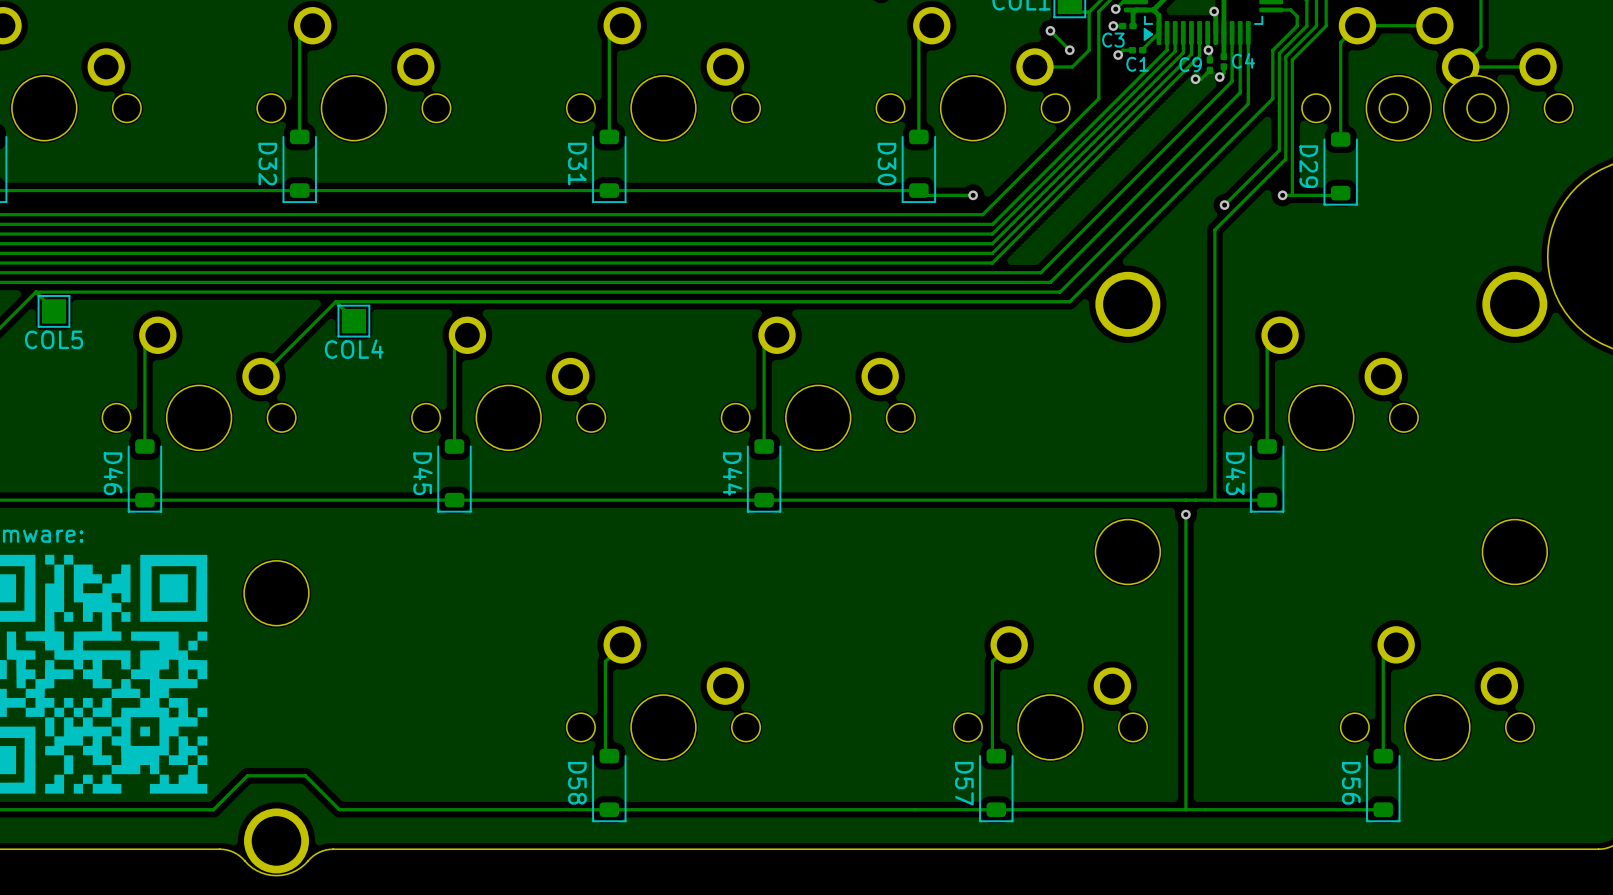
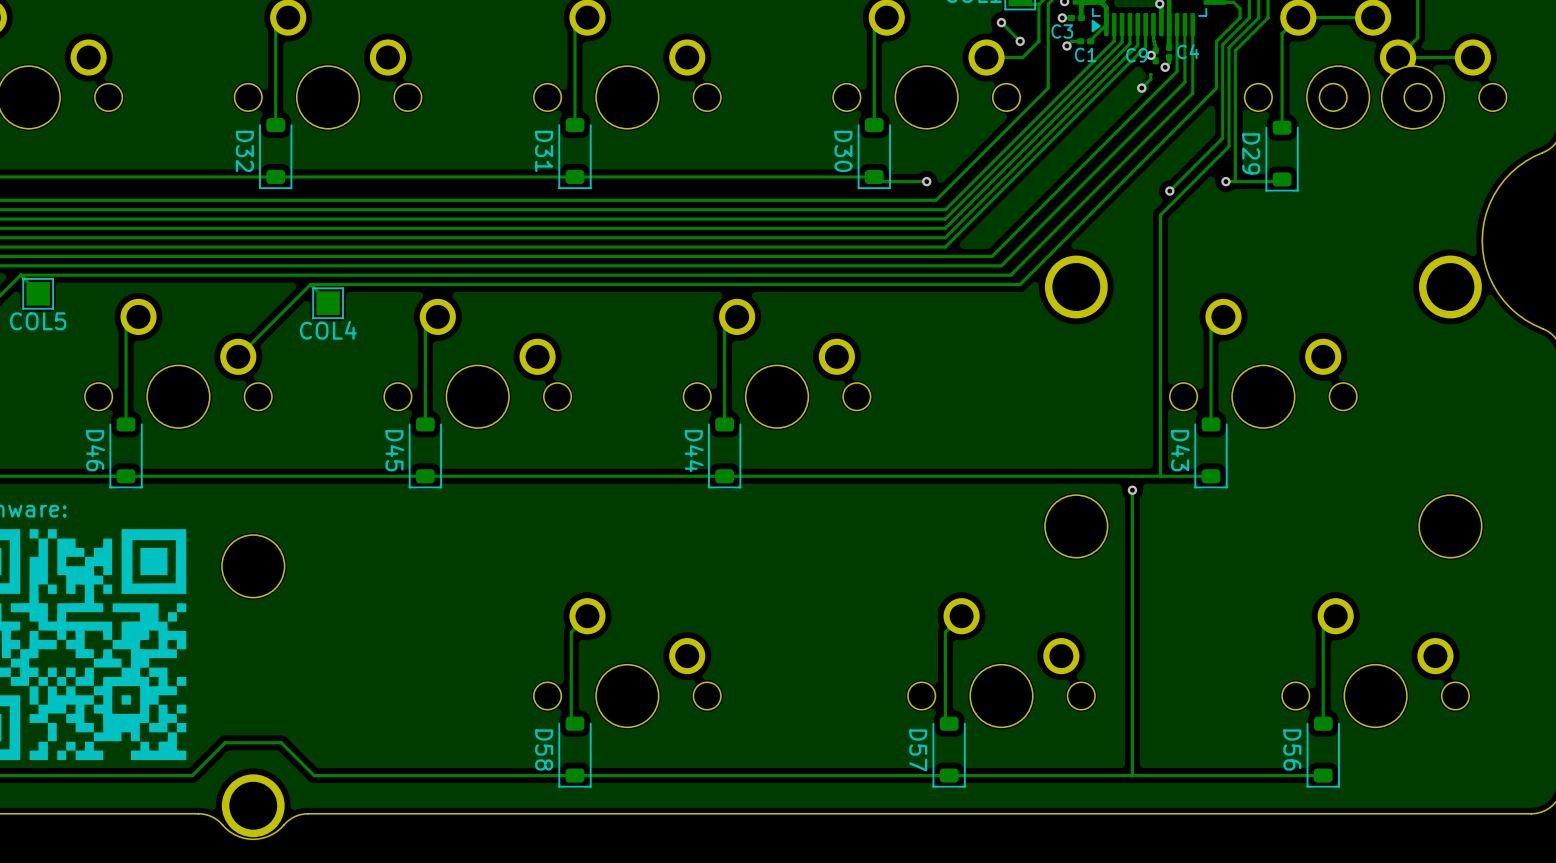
via: (1208, 50) -> none
via: none -> (1151, 55)
track: (1209, 70) (1201, 79) (1195, 79) -> none
via: (1195, 79) -> none
track: none -> (1151, 74) (1150, 79) (1141, 88)
via: none -> (1141, 88)

